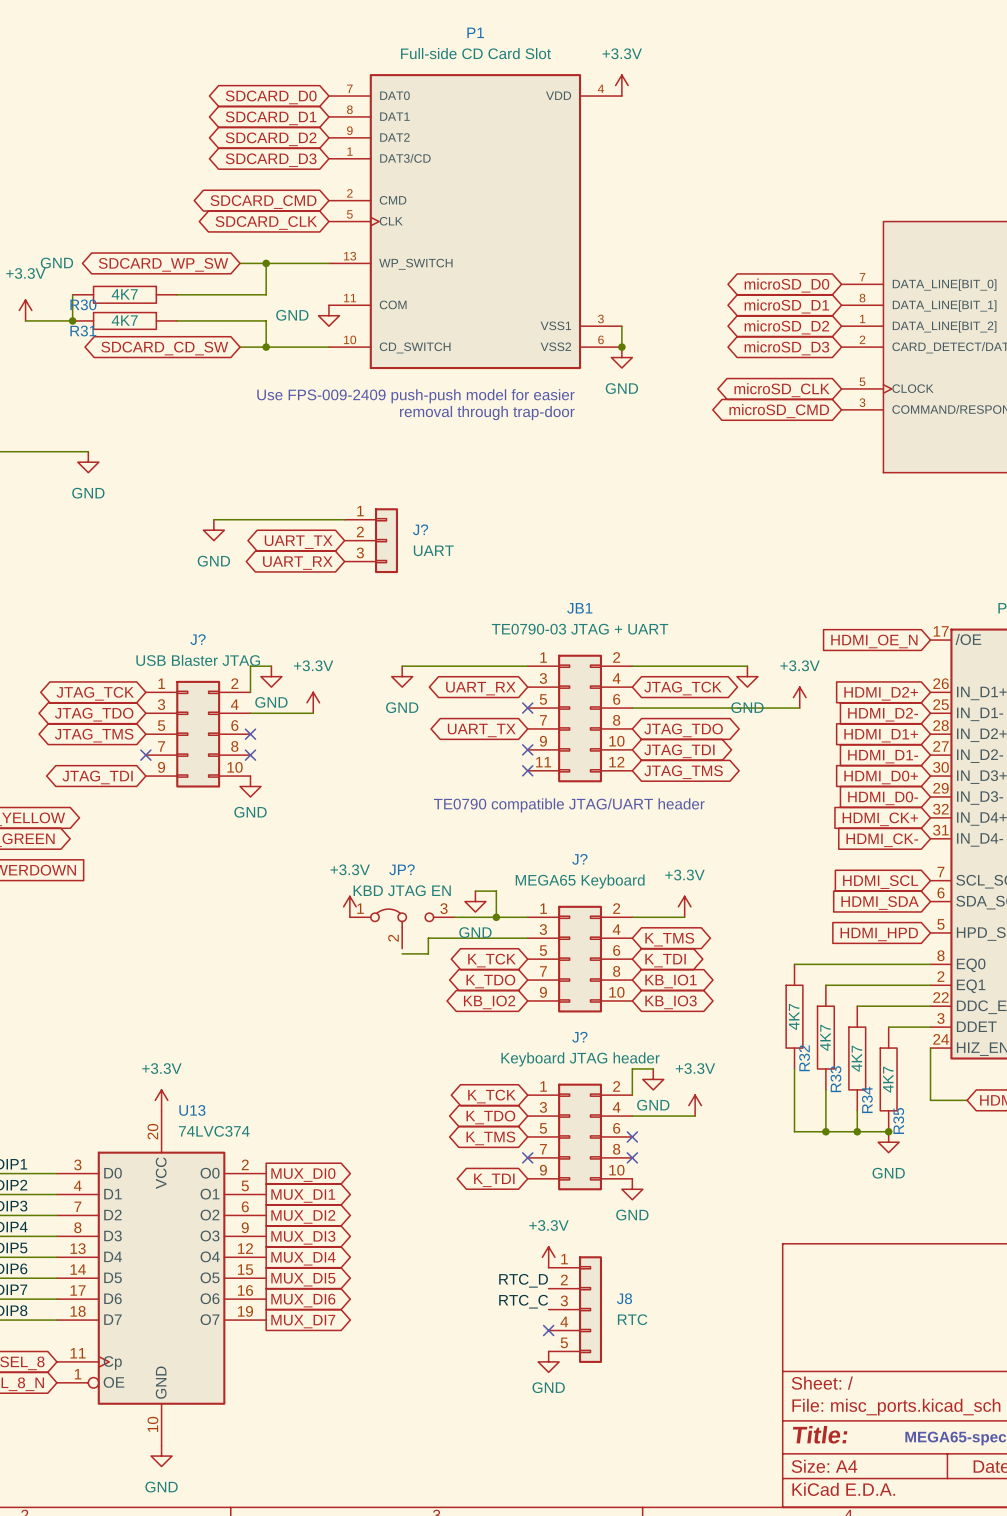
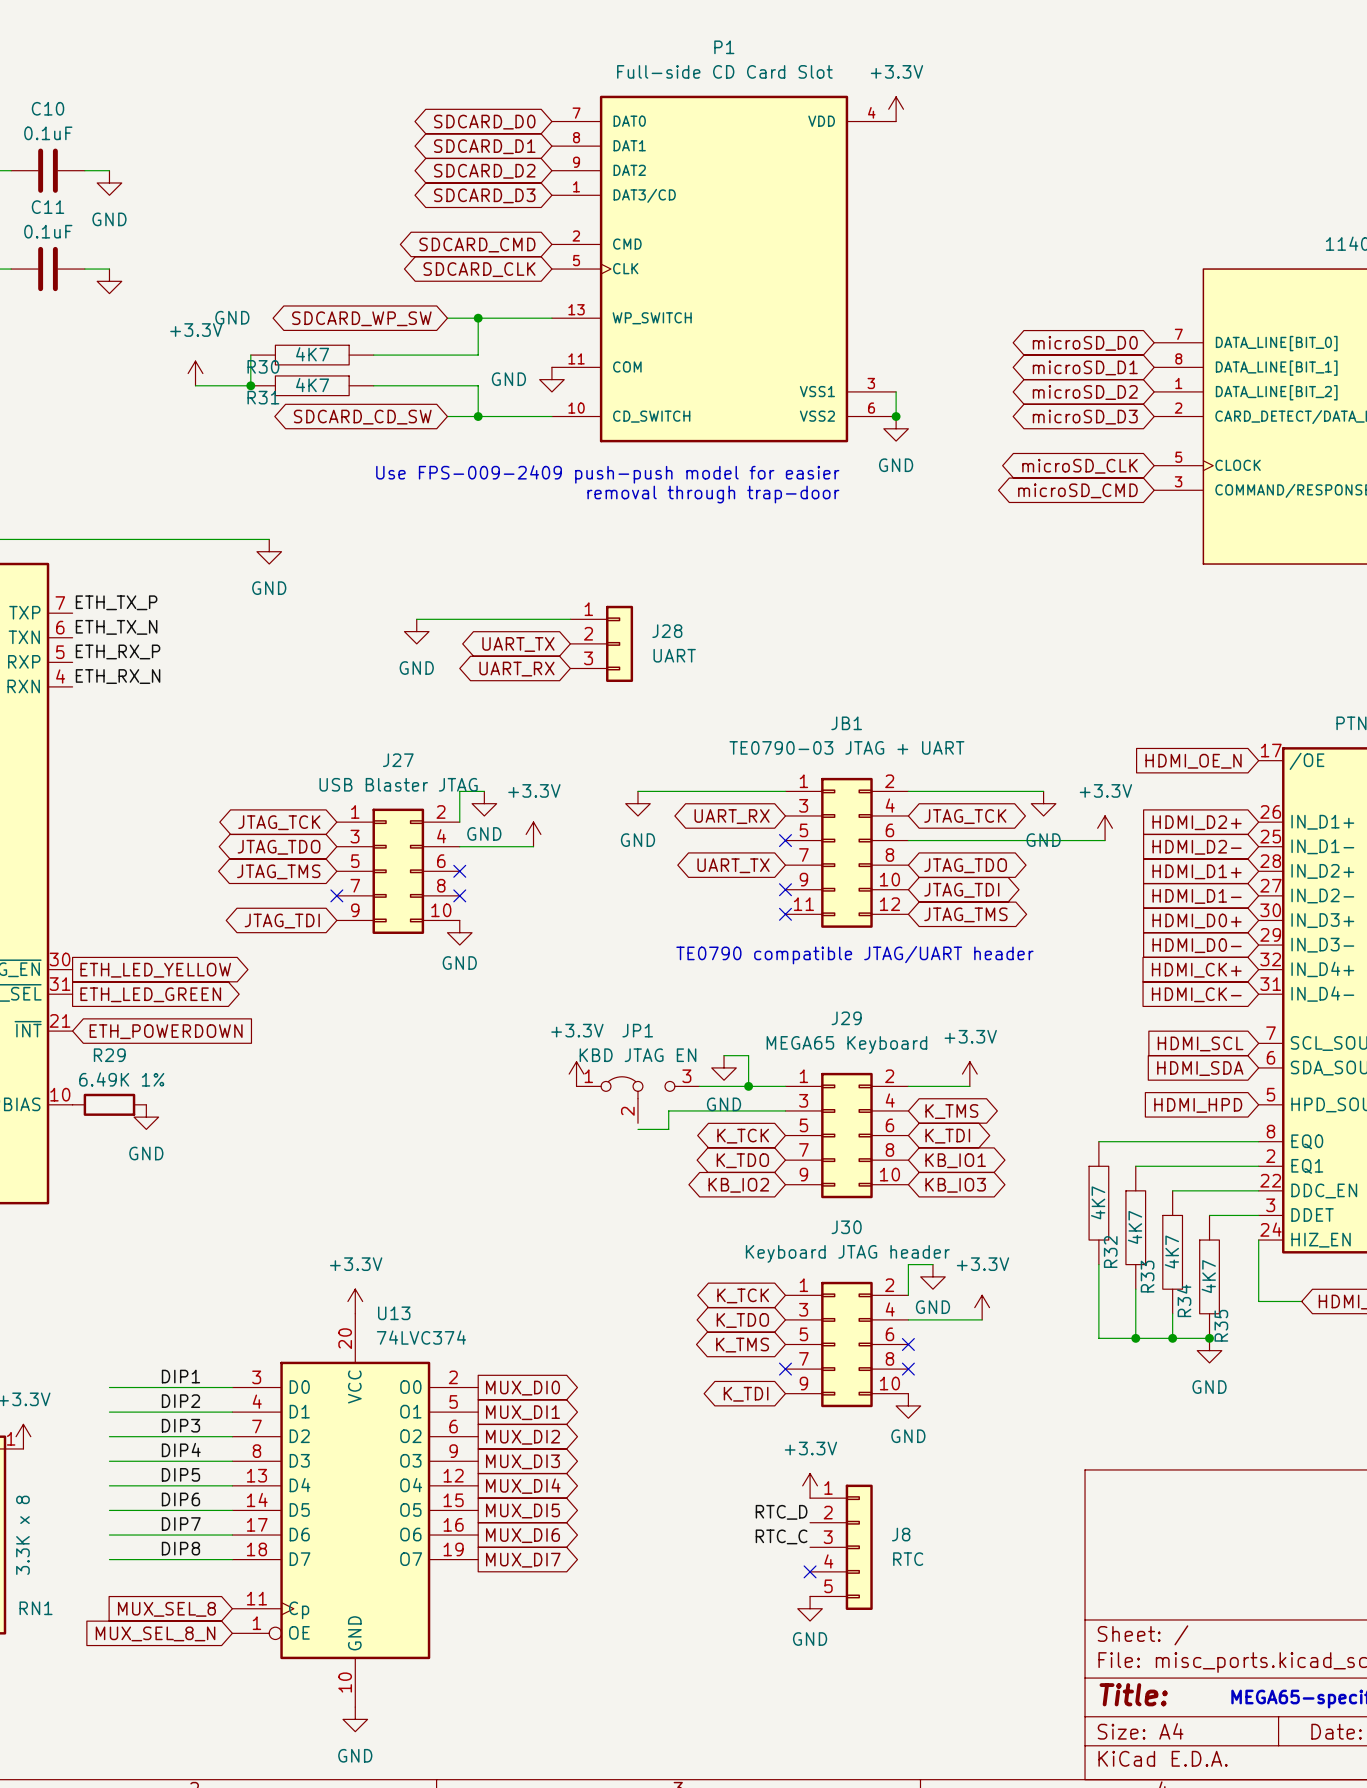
J? name: J? (420, 529) -> J28 (667, 631)
J? name: J? (198, 639) -> J27 (398, 760)
J? name: J? (579, 859) -> J29 (846, 1018)
JP? name: JP? (402, 869) -> JP1 (637, 1030)
J? name: J? (579, 1037) -> J30 (846, 1227)

